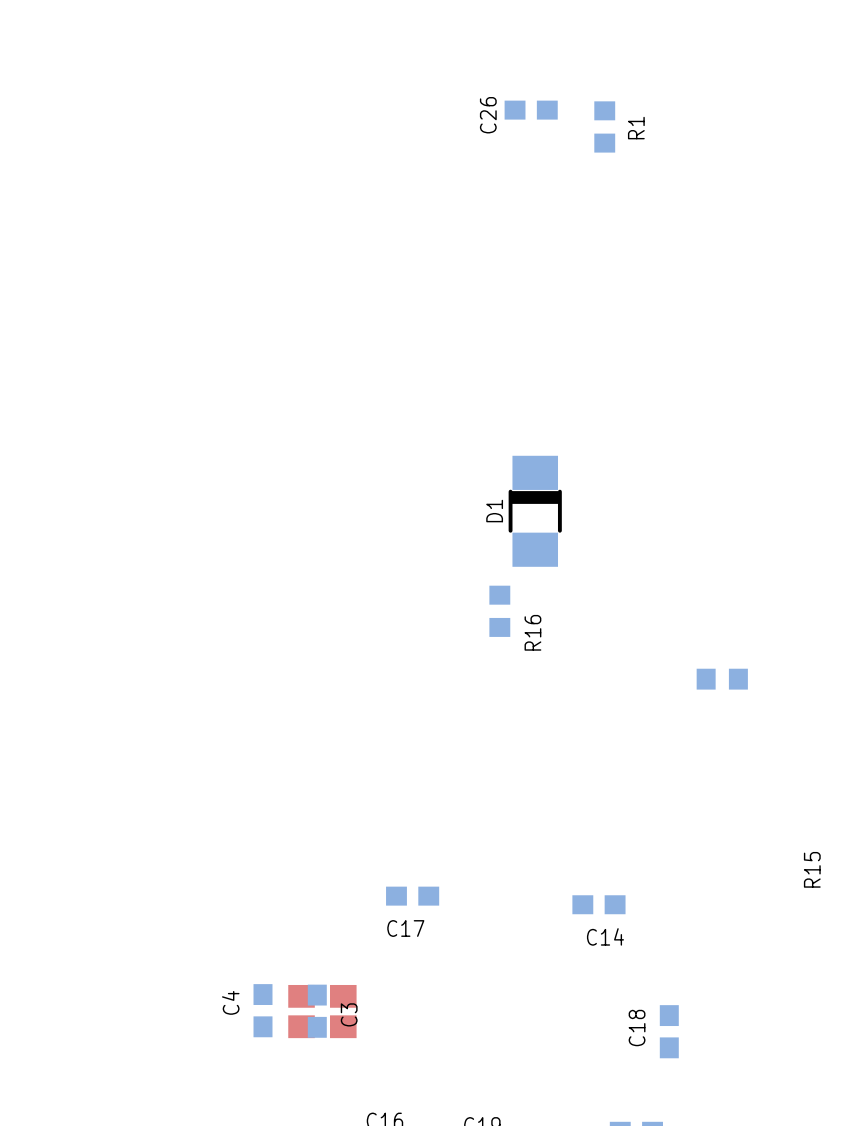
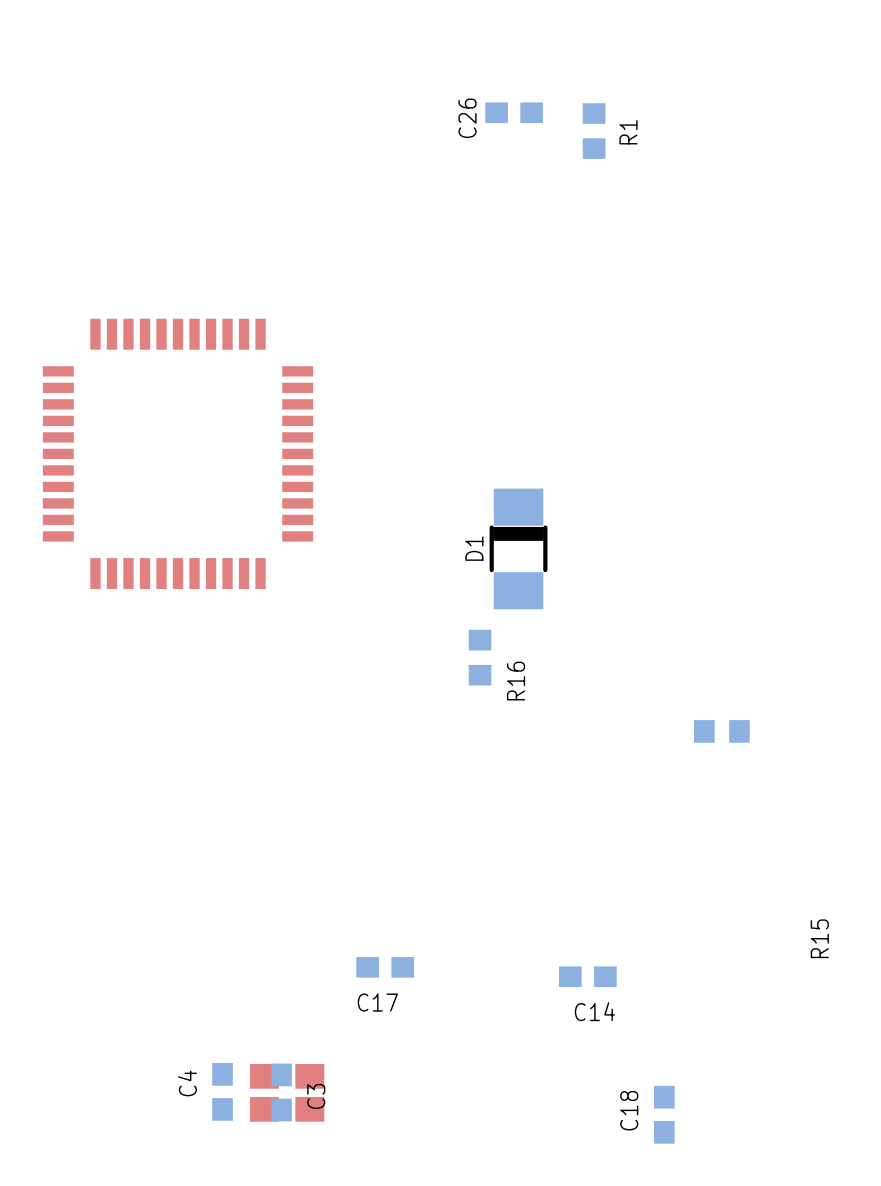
part: none -> (178, 453)

